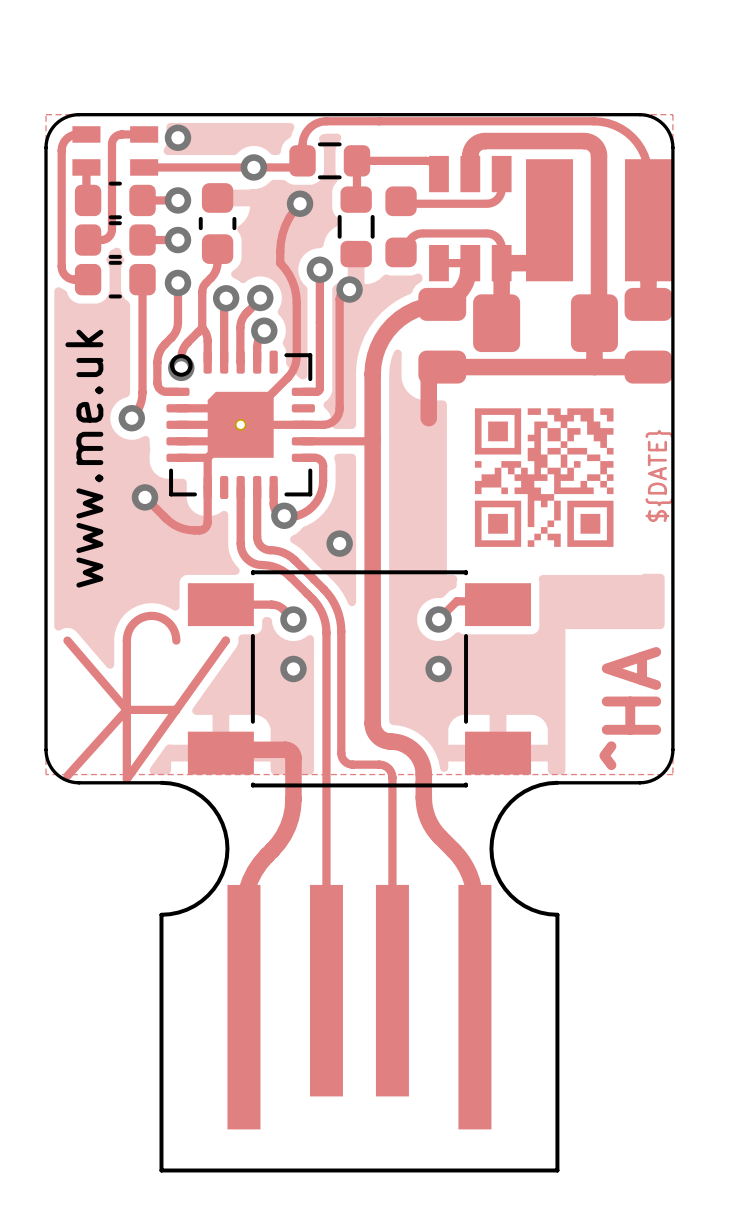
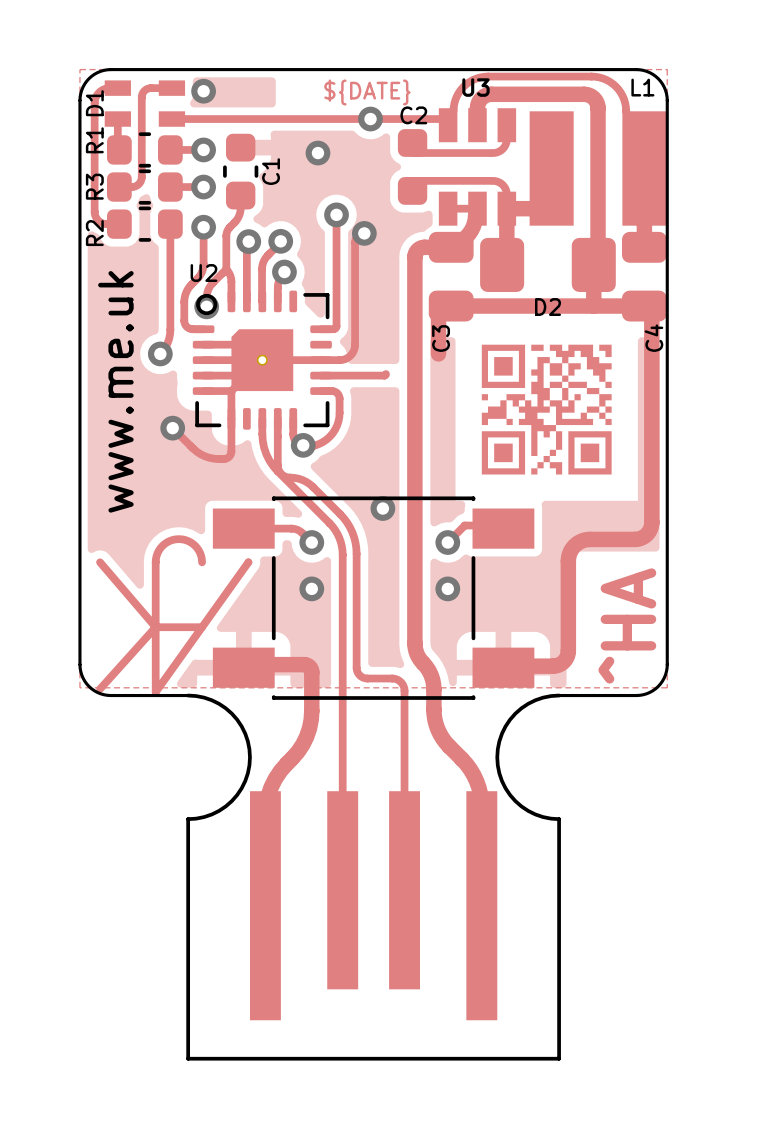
L1: none -> (642, 87)
D1 name: none -> D1 (94, 103)
part: (329, 160) -> none
C2: none -> (413, 115)
via position: (253, 167) -> (370, 119)
track: (295, 167) (302, 162) (302, 142) (305, 133) (314, 124) (323, 121) (600, 121) (614, 125) (627, 132) (637, 142) (644, 155) (648, 176) (648, 220) -> none
track: (438, 174) (436, 165) (427, 160) (356, 160) (356, 199) -> (448, 125) (441, 119) (314, 119)
R1 name: none -> R1 (94, 140)
track: (300, 203) (285, 225) (280, 251) (280, 263) (292, 281) (296, 295) (295, 363) (287, 378) (240, 424) -> none
C1 name: none -> C1 (271, 171)
part: (356, 226) -> none
R3 name: none -> R3 (94, 186)
U3: none -> (532, 197)
part: (528, 258) -> none
R2 name: none -> R2 (94, 233)
track: (442, 304) (415, 309) (393, 324) (377, 347) (372, 374) (372, 725) (375, 733) (381, 738) (401, 743) (414, 751) (421, 763) (423, 776) -> (451, 247) (422, 247) (417, 250) (414, 257) (414, 643) (418, 656) (431, 675) (433, 689)
U2 name: none -> U2 (203, 273)
track: none -> (644, 306) (644, 309) (651, 316) (650, 528) (645, 535) (638, 539) (587, 539) (574, 545) (568, 558) (568, 650) (566, 658) (562, 662) (554, 666) (504, 666)
D2: none -> (548, 307)
C3: none -> (441, 338)
C4: none -> (653, 338)
text rotation: 0° (659, 475) -> 90° clockwise (367, 92)
text position: ${DATE} (659, 475) -> ${DATE} (367, 92)
track: (240, 503) (240, 546) (245, 556) (253, 563) (277, 568) (290, 576) -> (262, 434) (264, 447) (273, 466) (308, 502)
via position: (339, 543) -> (382, 508)

